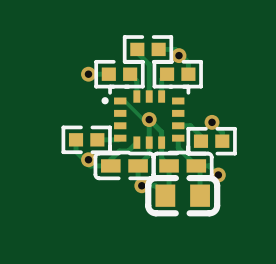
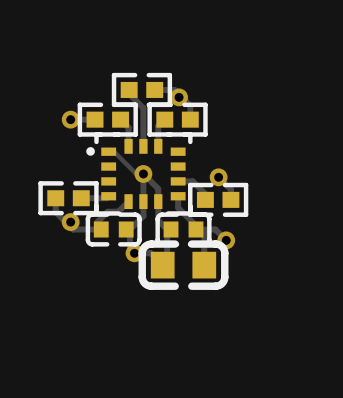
part footprint: [93, 151, 156, 181] -> [85, 212, 142, 247]
part footprint: [151, 151, 214, 181] -> [155, 212, 212, 247]

